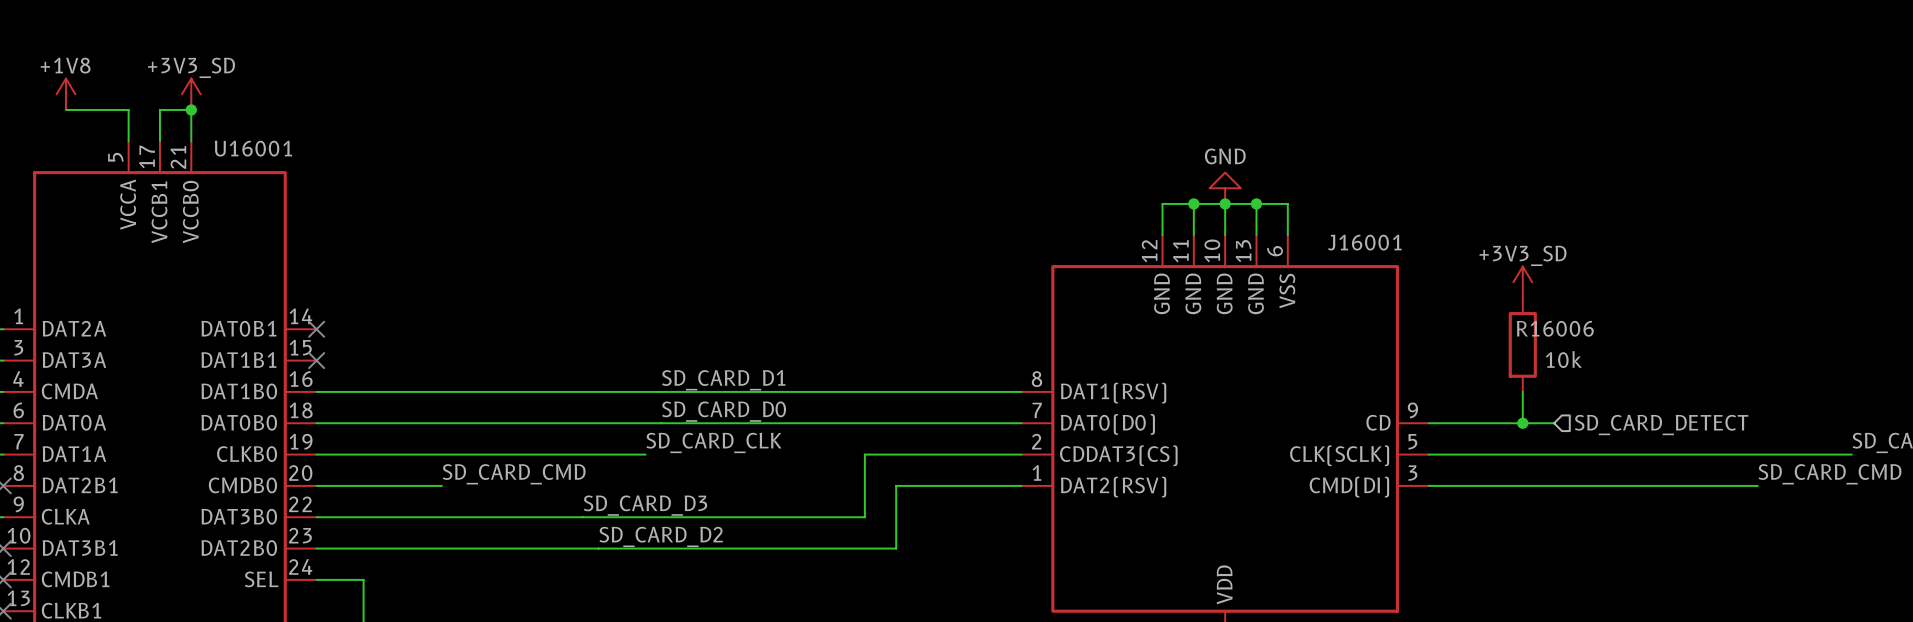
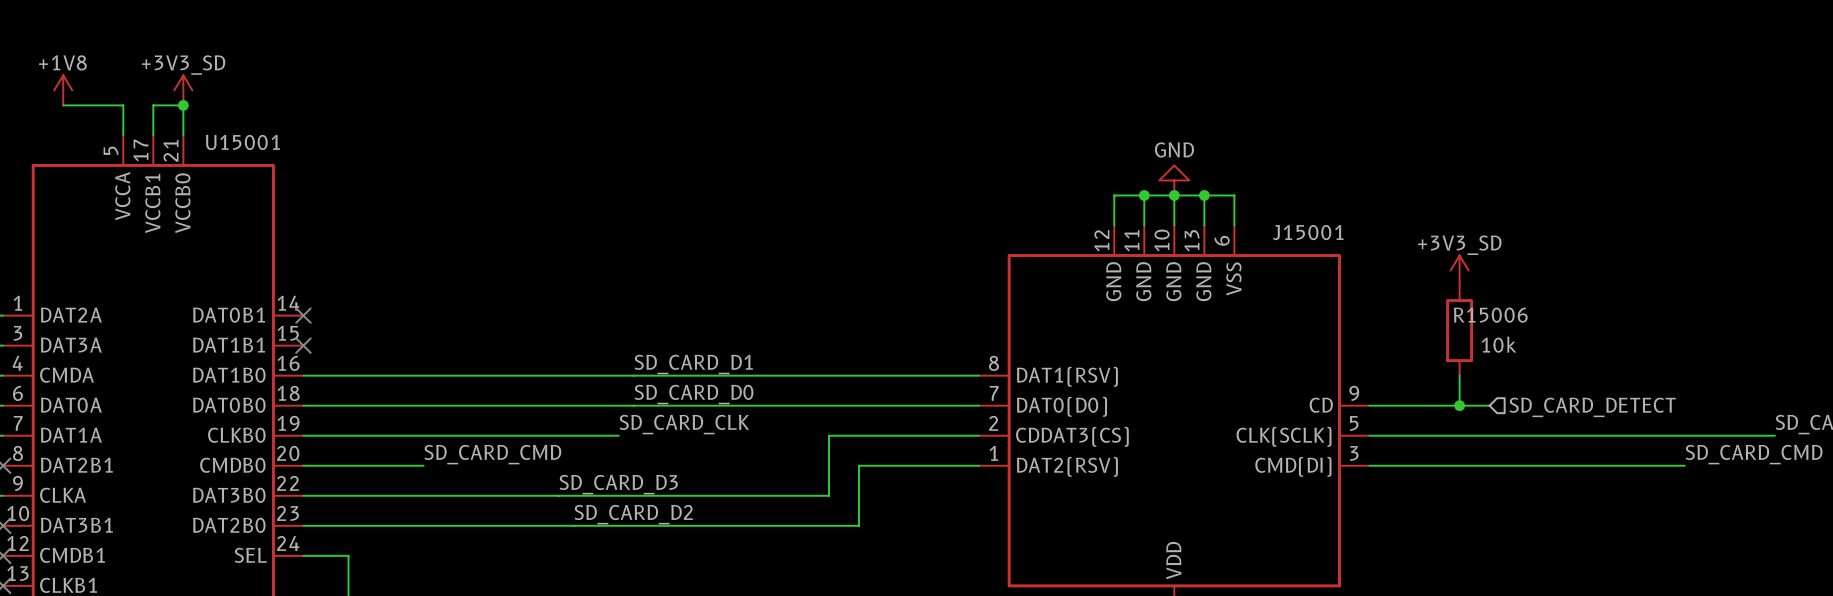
U16001 name: U16001 (253, 148) -> U15001 (242, 142)
J16001 name: J16001 (1364, 242) -> J15001 (1308, 232)
R16006 name: R16006 (1555, 328) -> R15006 (1490, 315)

